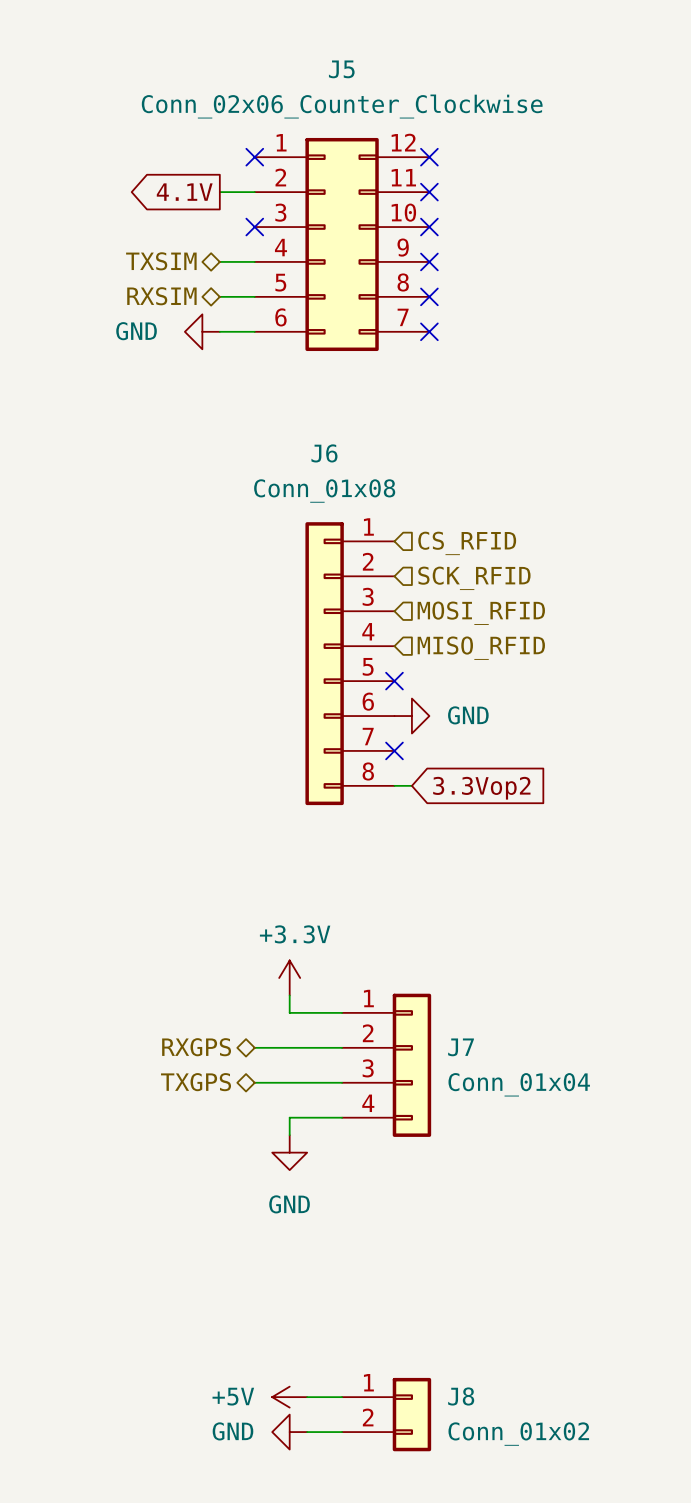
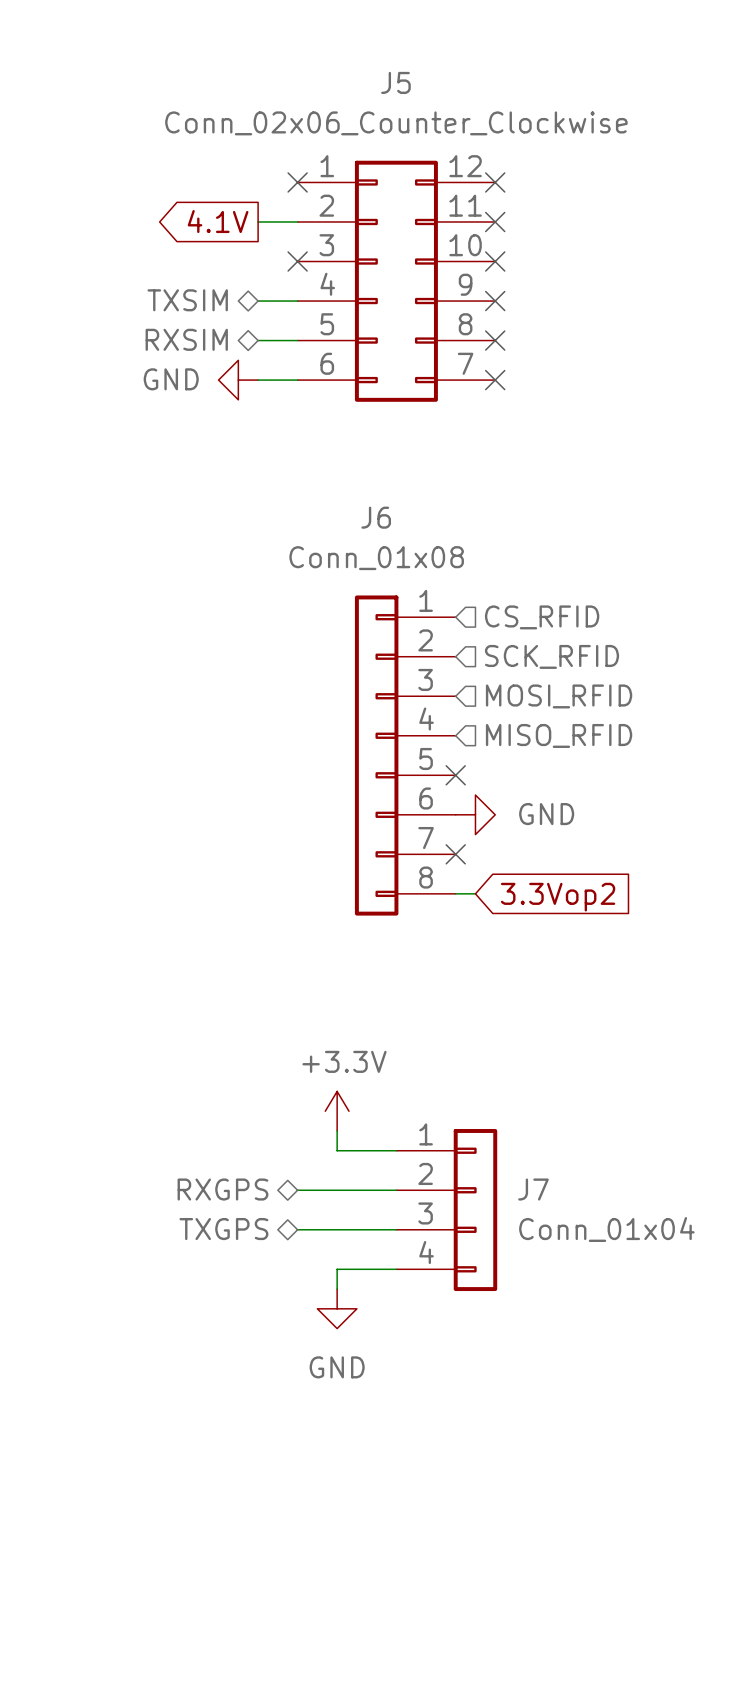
power symbol: +5V (289, 1397) -> none
wire: (307, 1397) (342, 1397) -> none
J8: Conn_01x02 (386, 1414) -> none
power symbol: GND (289, 1432) -> none
wire: (307, 1432) (342, 1432) -> none

